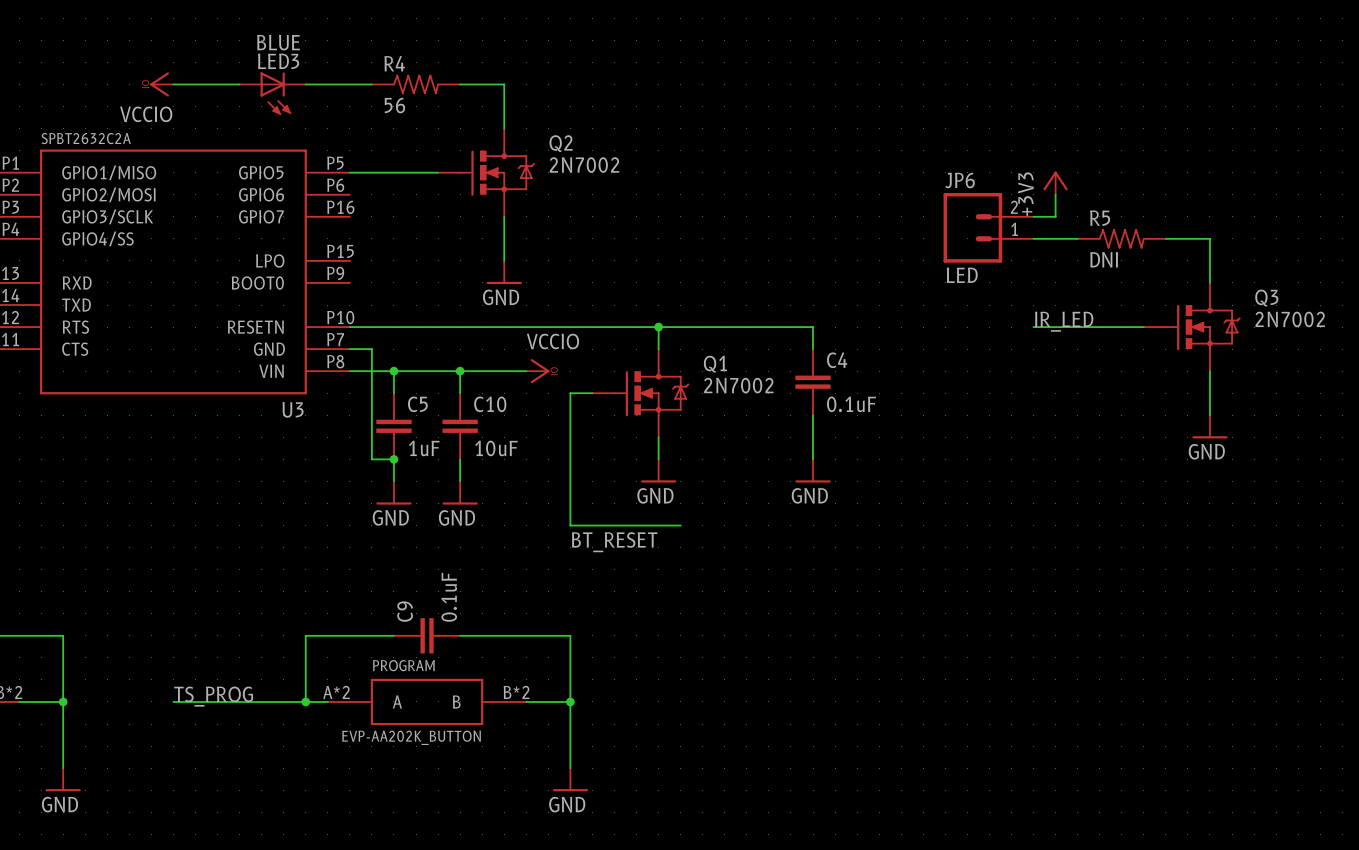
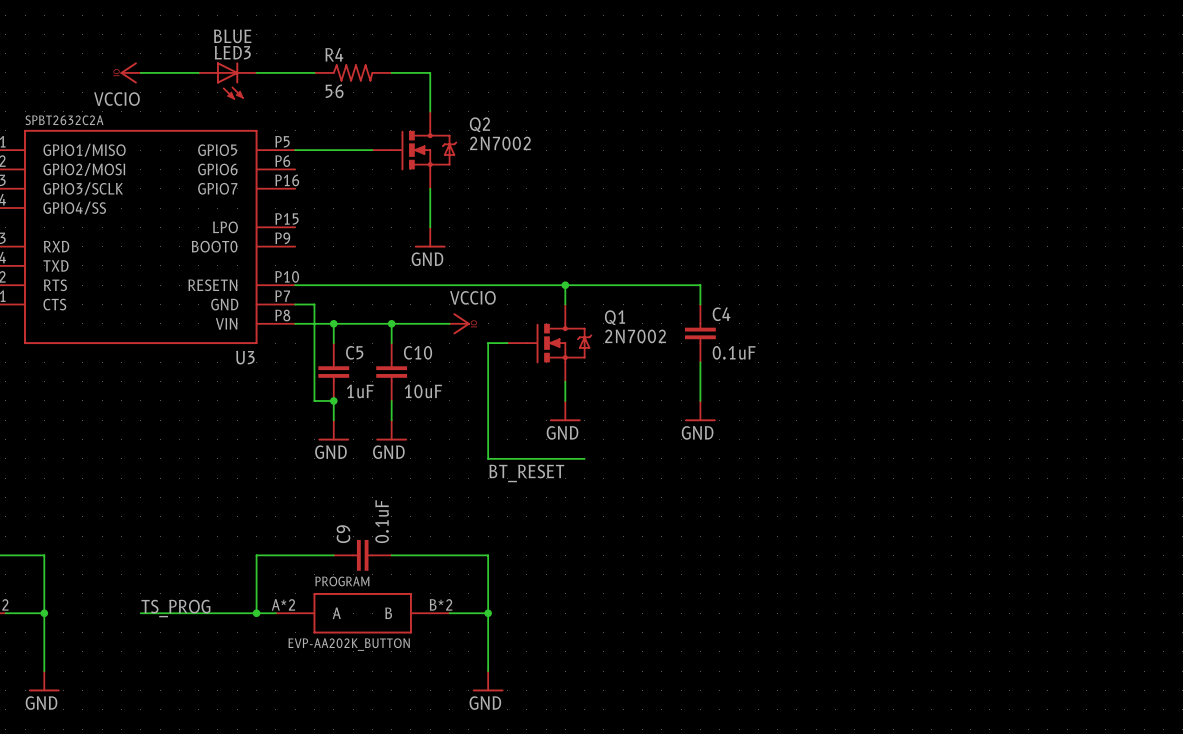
power symbol: +3V3 (1055, 183) -> none
wire: (1055, 194) (1055, 216) (1033, 216) -> none
JP6: LED (988, 227) -> none
wire: (1033, 238) (1077, 238) -> none
R5: DNI (1121, 238) -> none
wire: (1165, 238) (1209, 238) (1209, 282) -> none
label: IR_LED (1064, 321) -> none
wire: (1033, 327) (1143, 327) -> none
Q3: 2N7002 (1192, 327) -> none
wire: (1209, 371) (1209, 415) -> none
power symbol: GND (1209, 426) -> none

